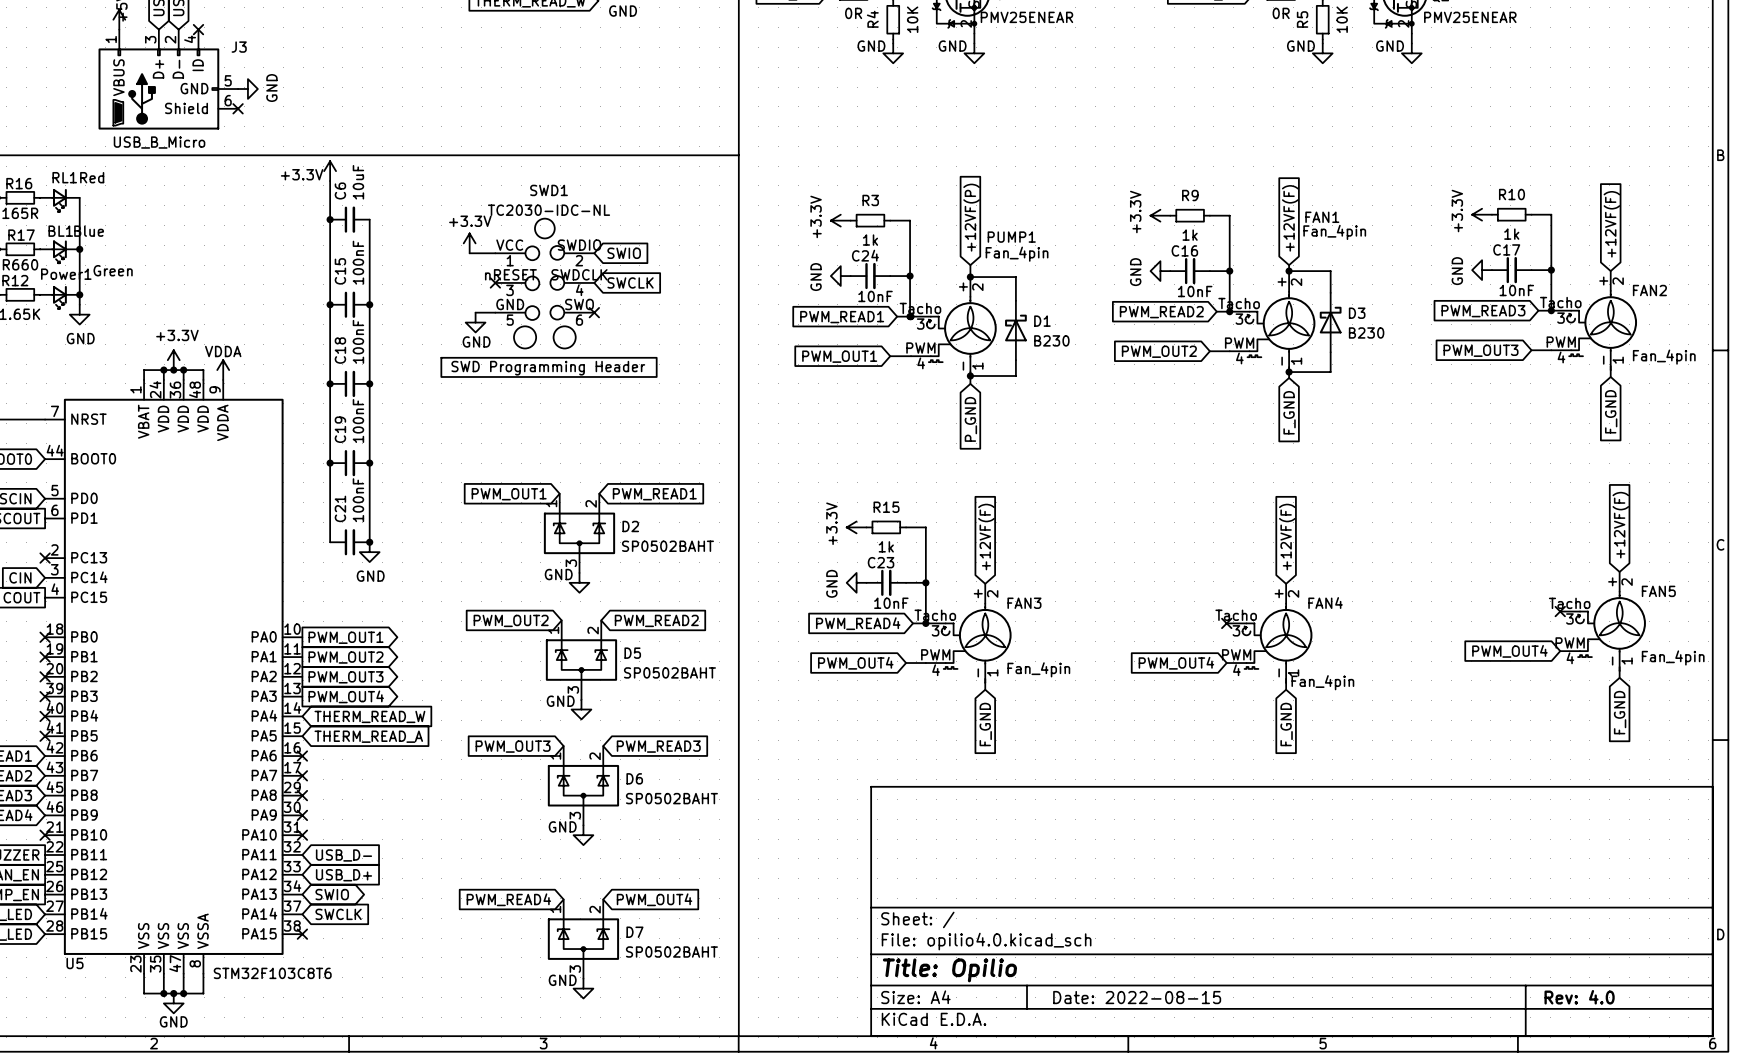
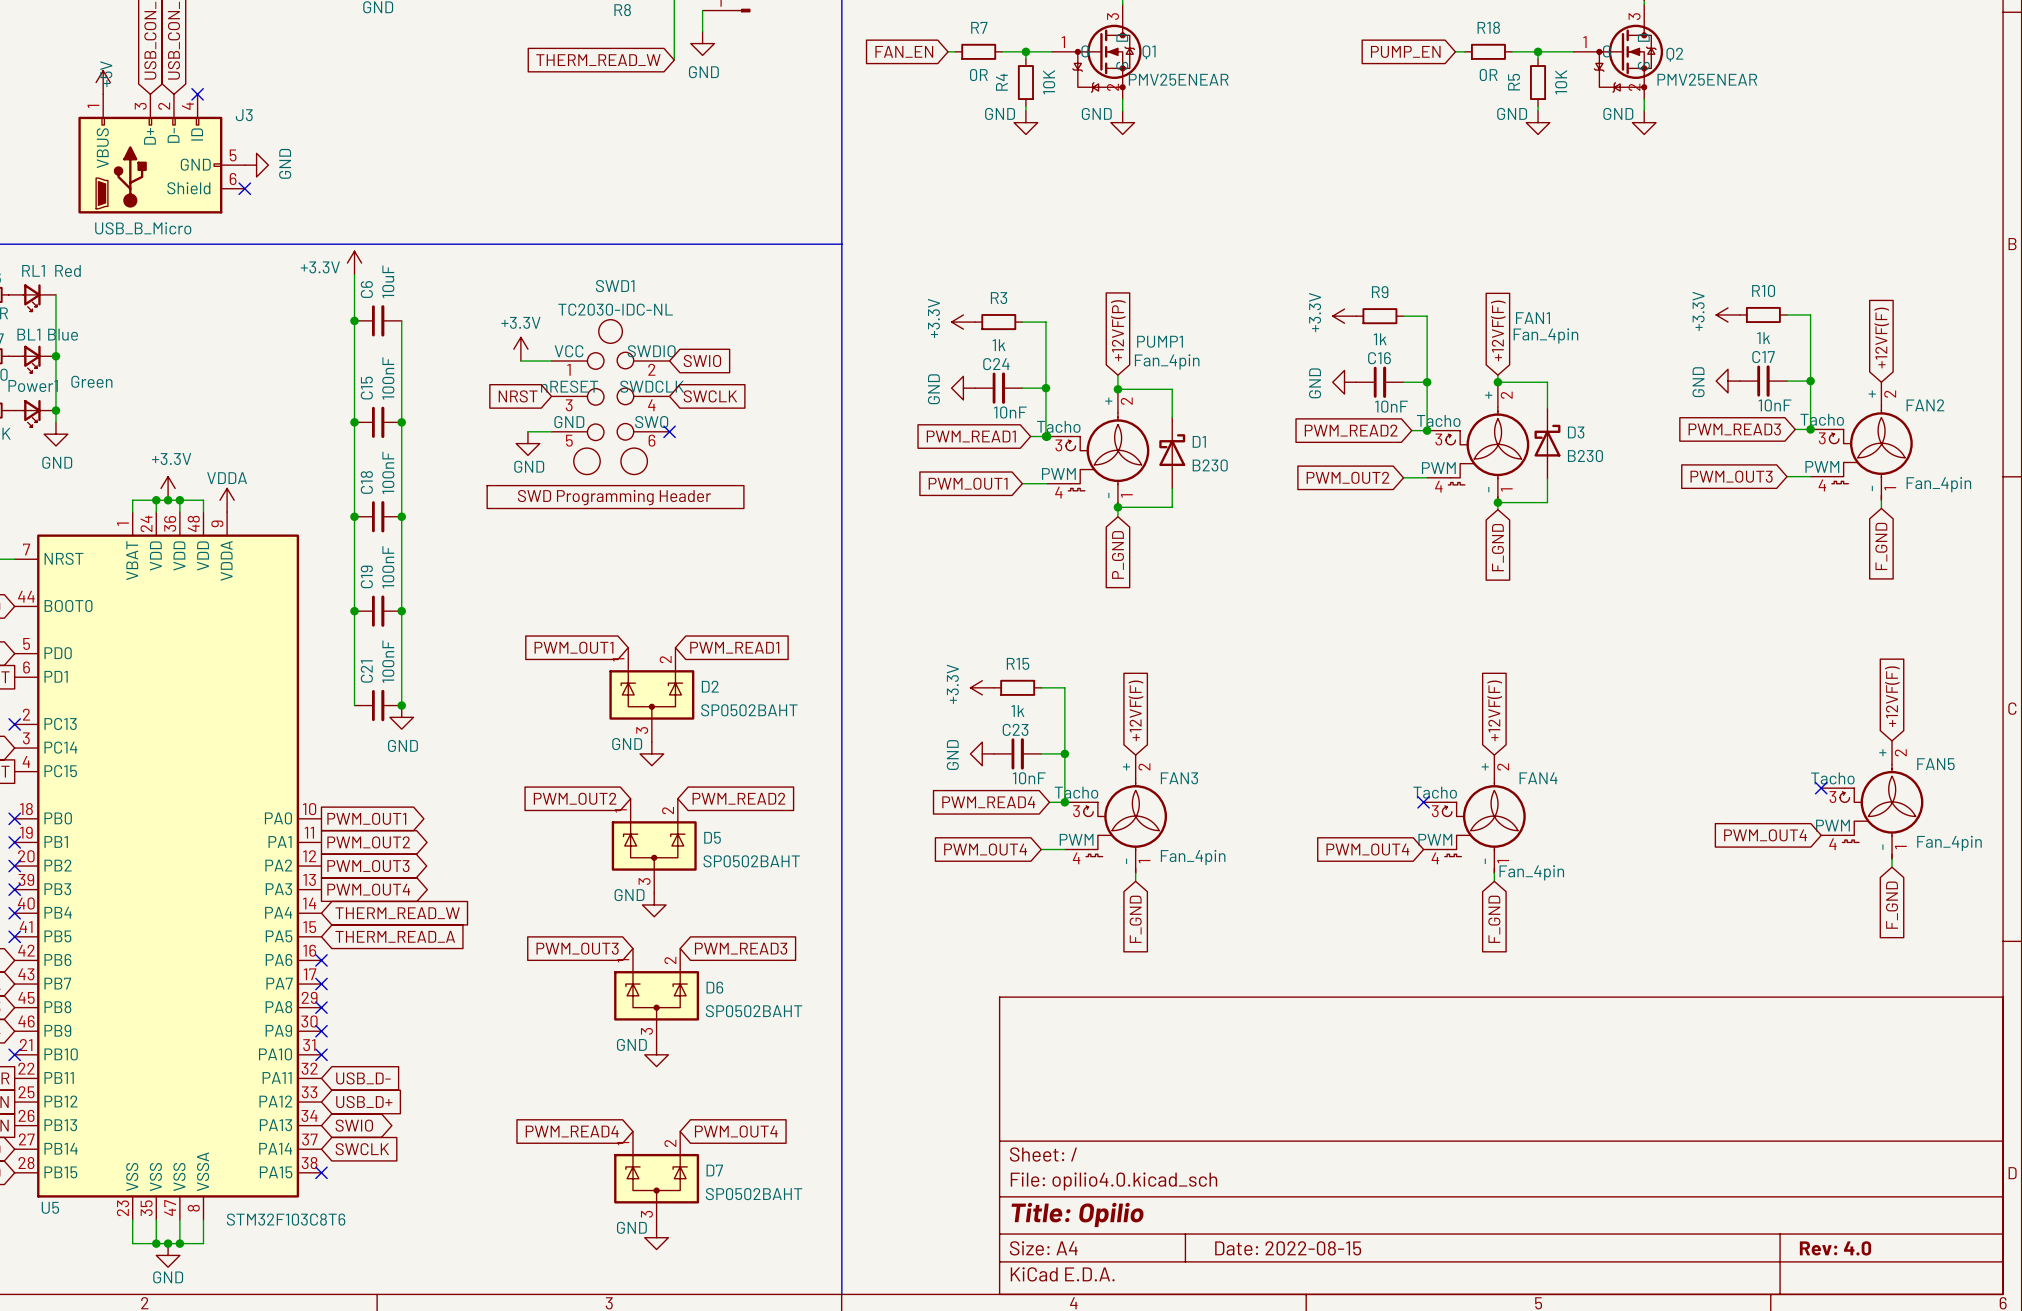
global label: none -> NRST (518, 396)
no-connect mark: (495, 282) -> none

